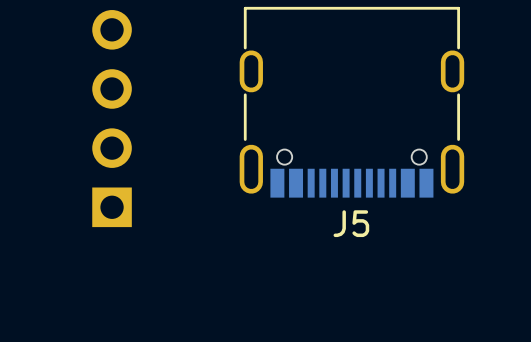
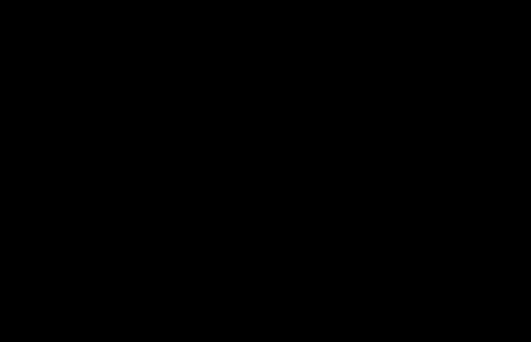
J5: (351, 102) -> none
part: (112, 118) -> none

